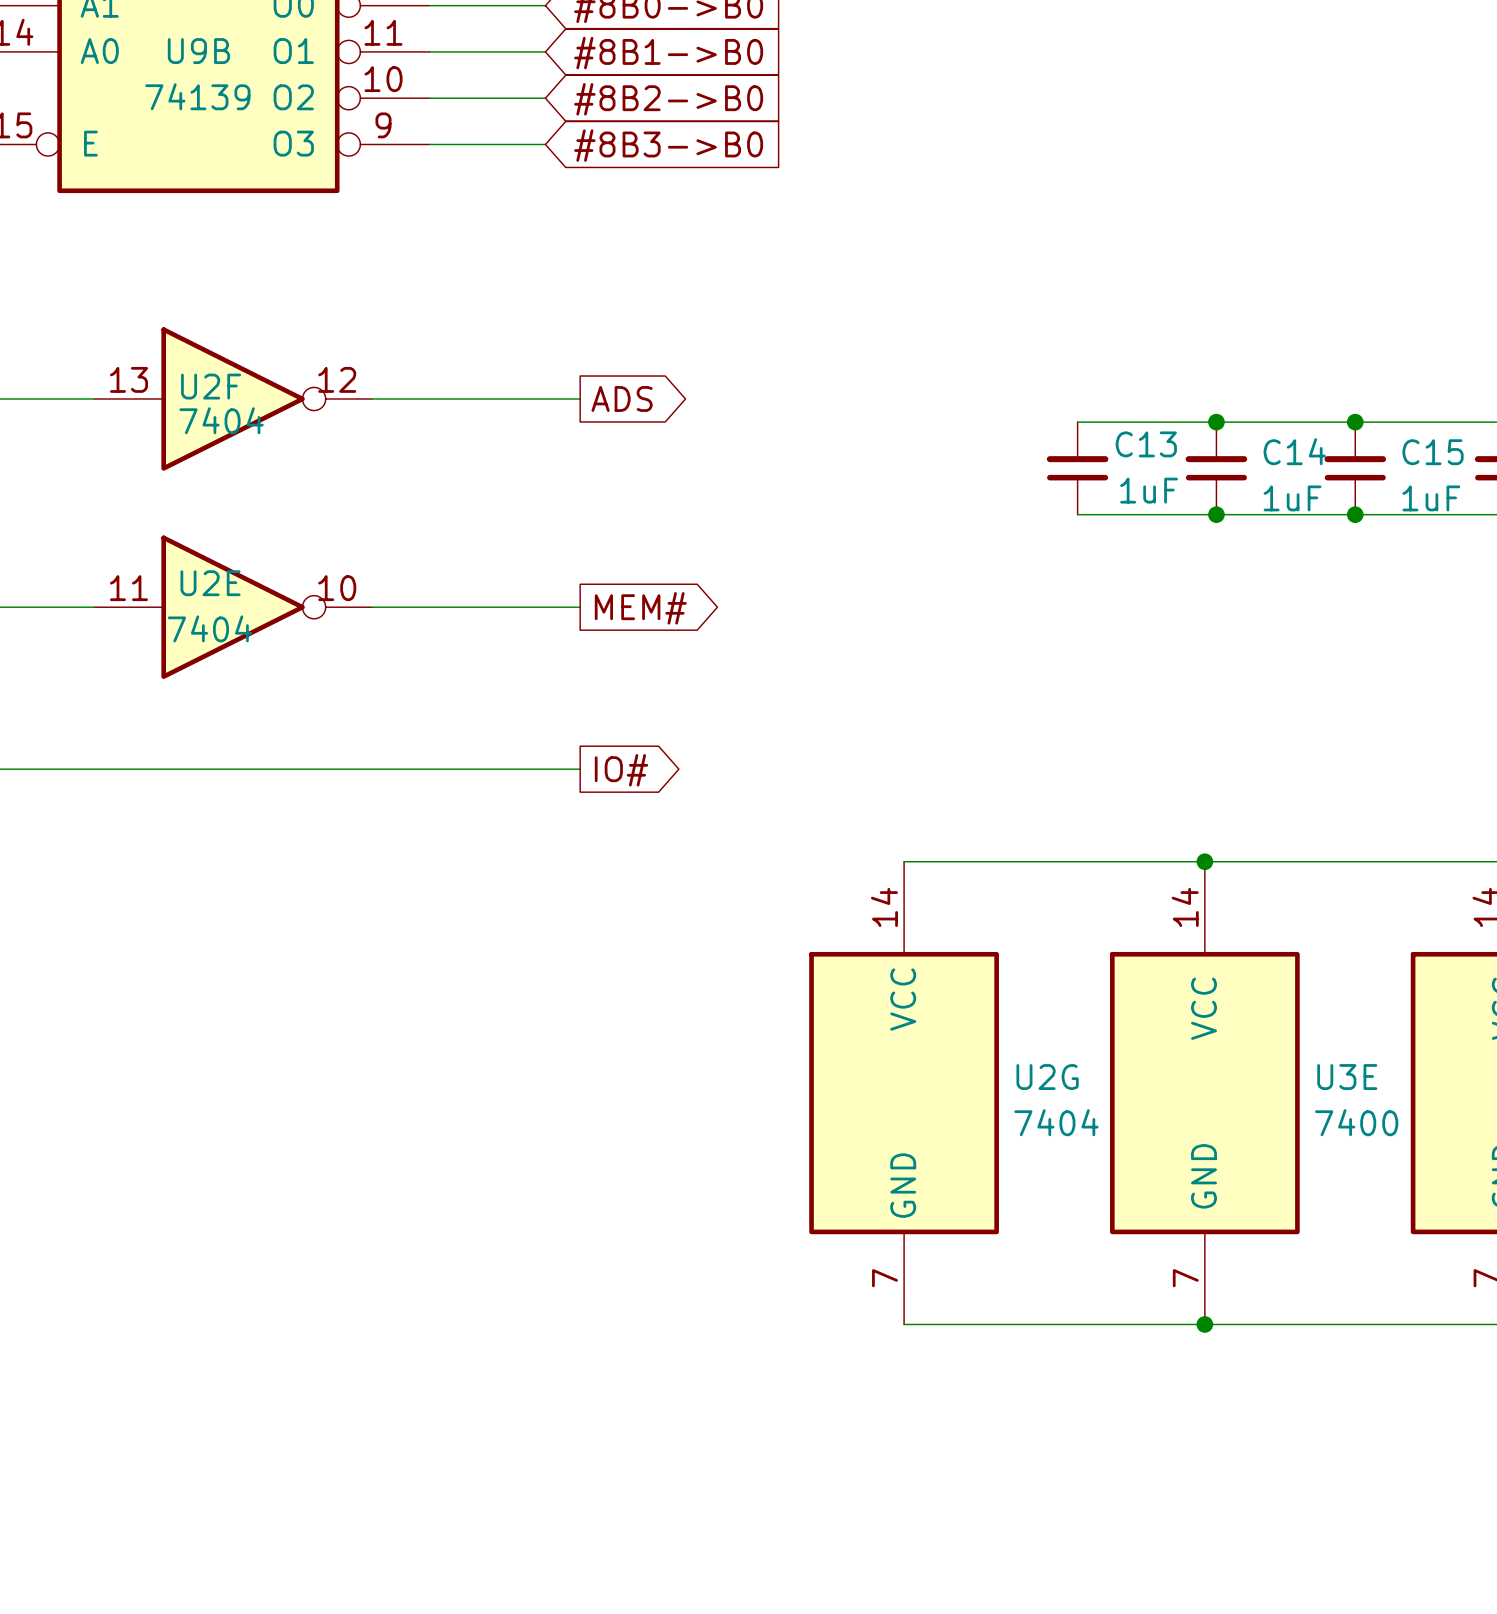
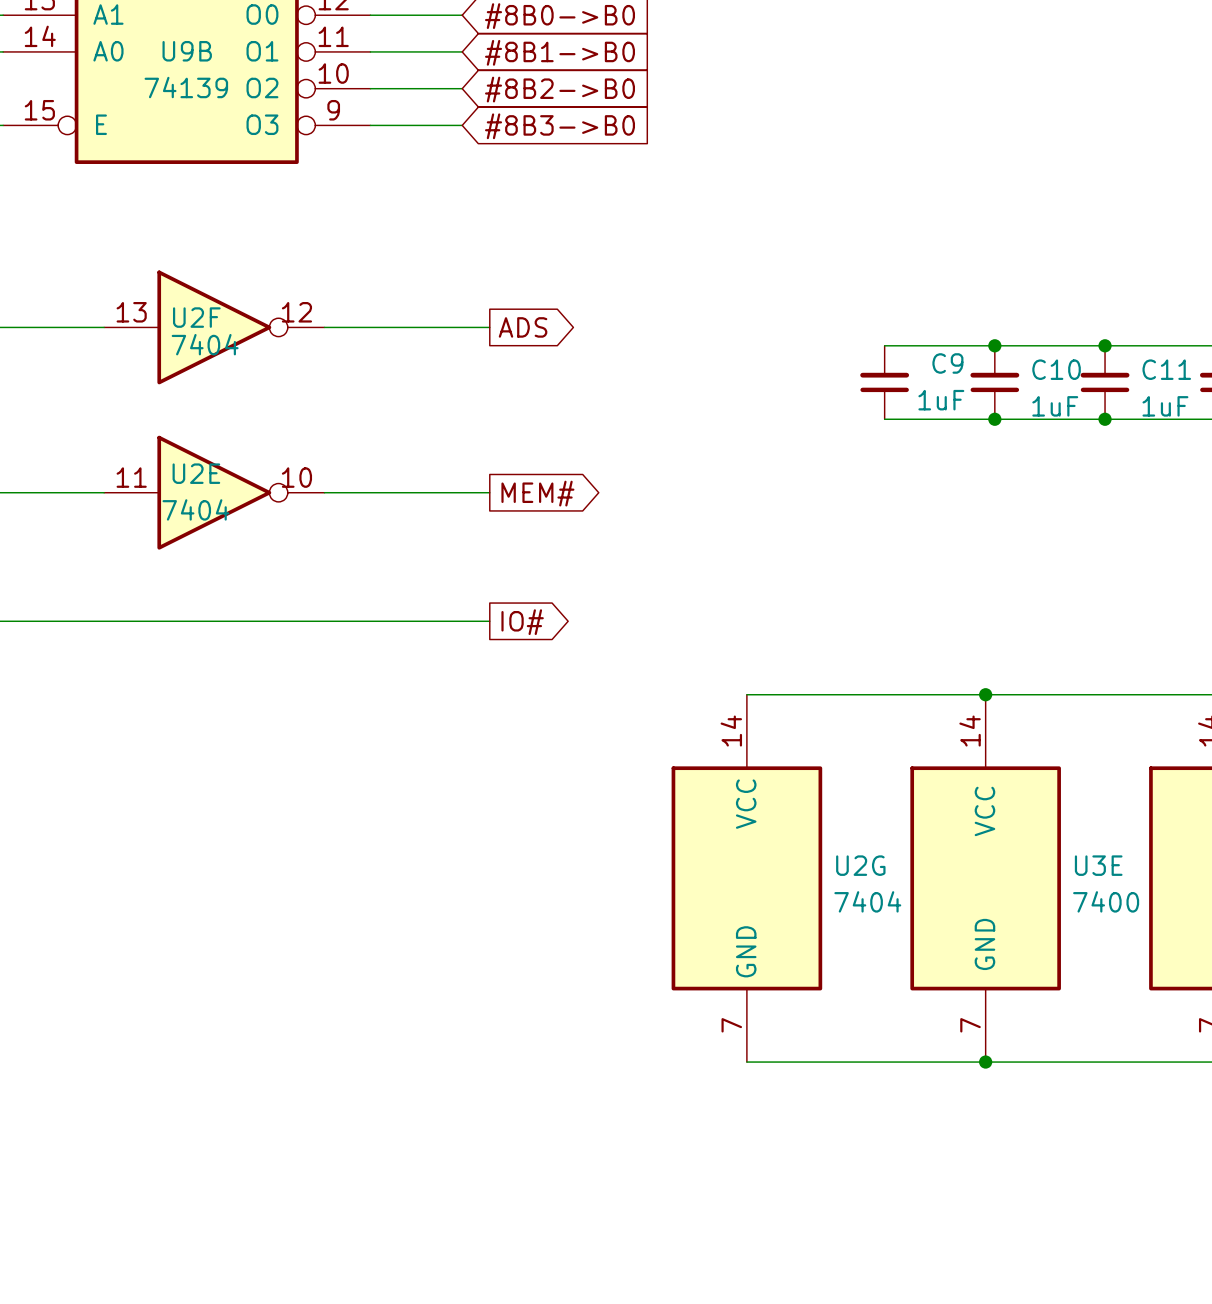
C13 name: C13 (1146, 444) -> C9 (947, 363)
C14 name: C14 (1294, 451) -> C10 (1056, 369)
C15 name: C15 (1433, 452) -> C11 (1166, 369)

